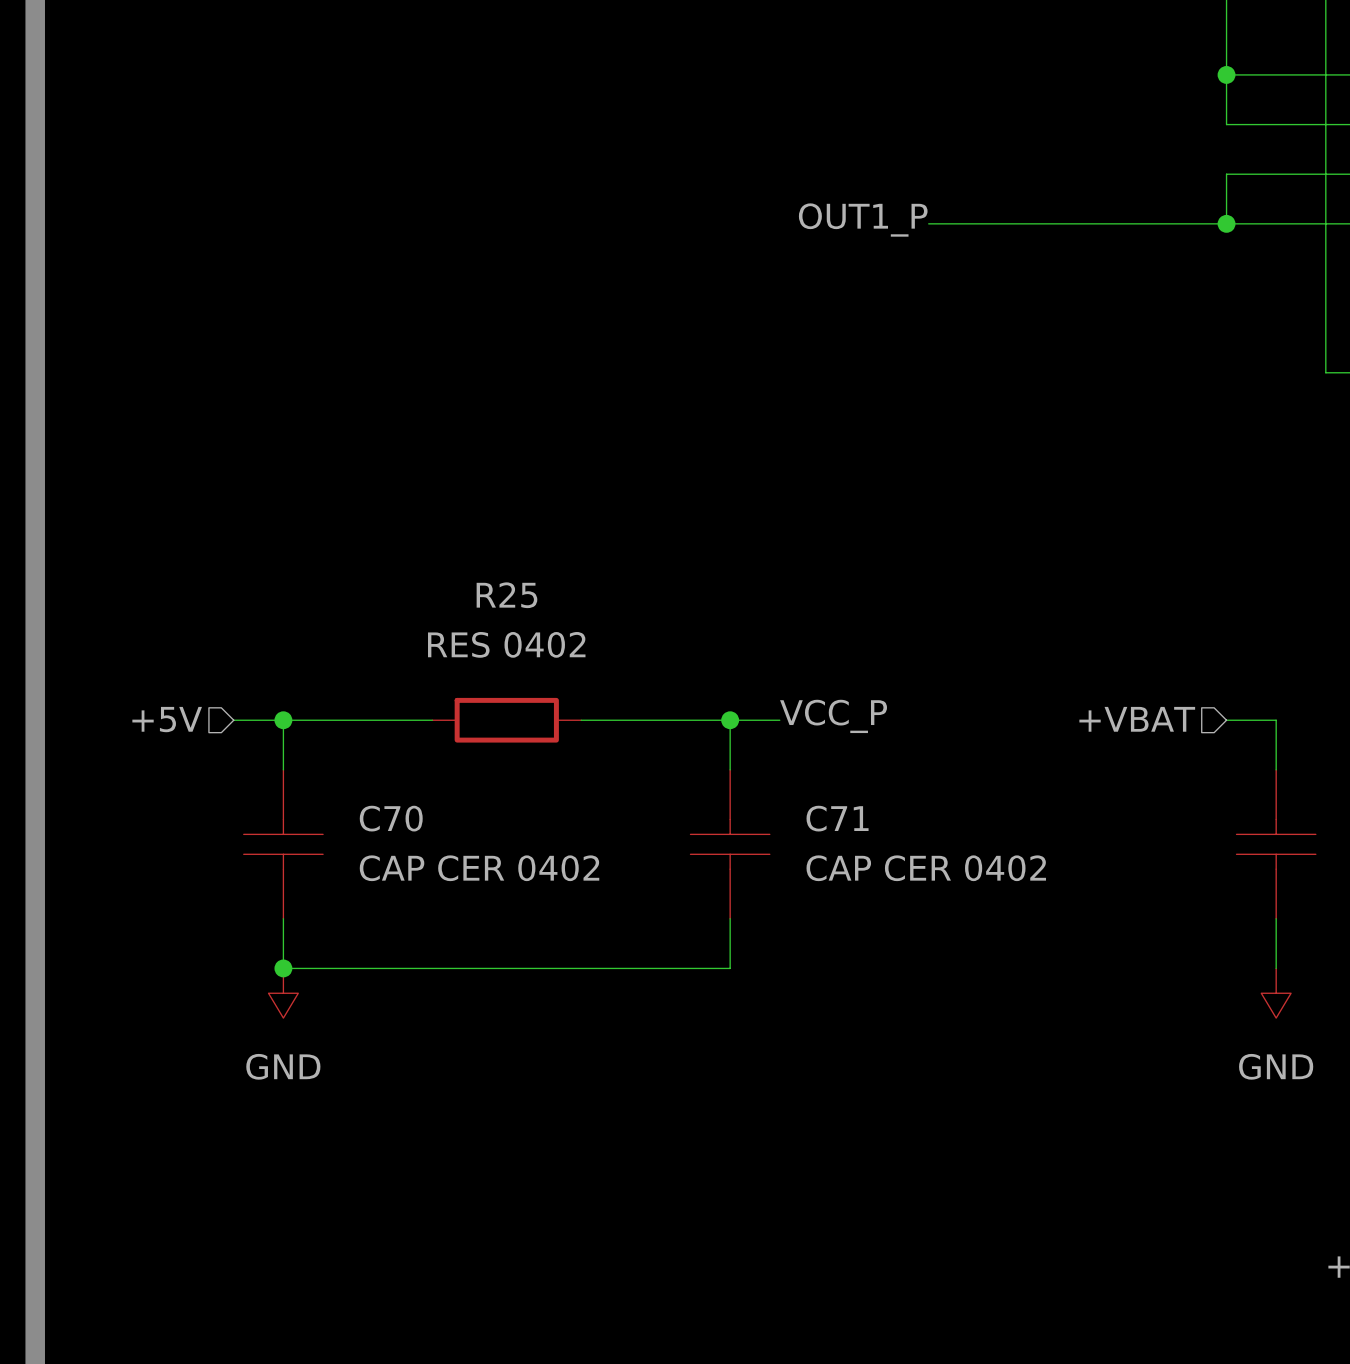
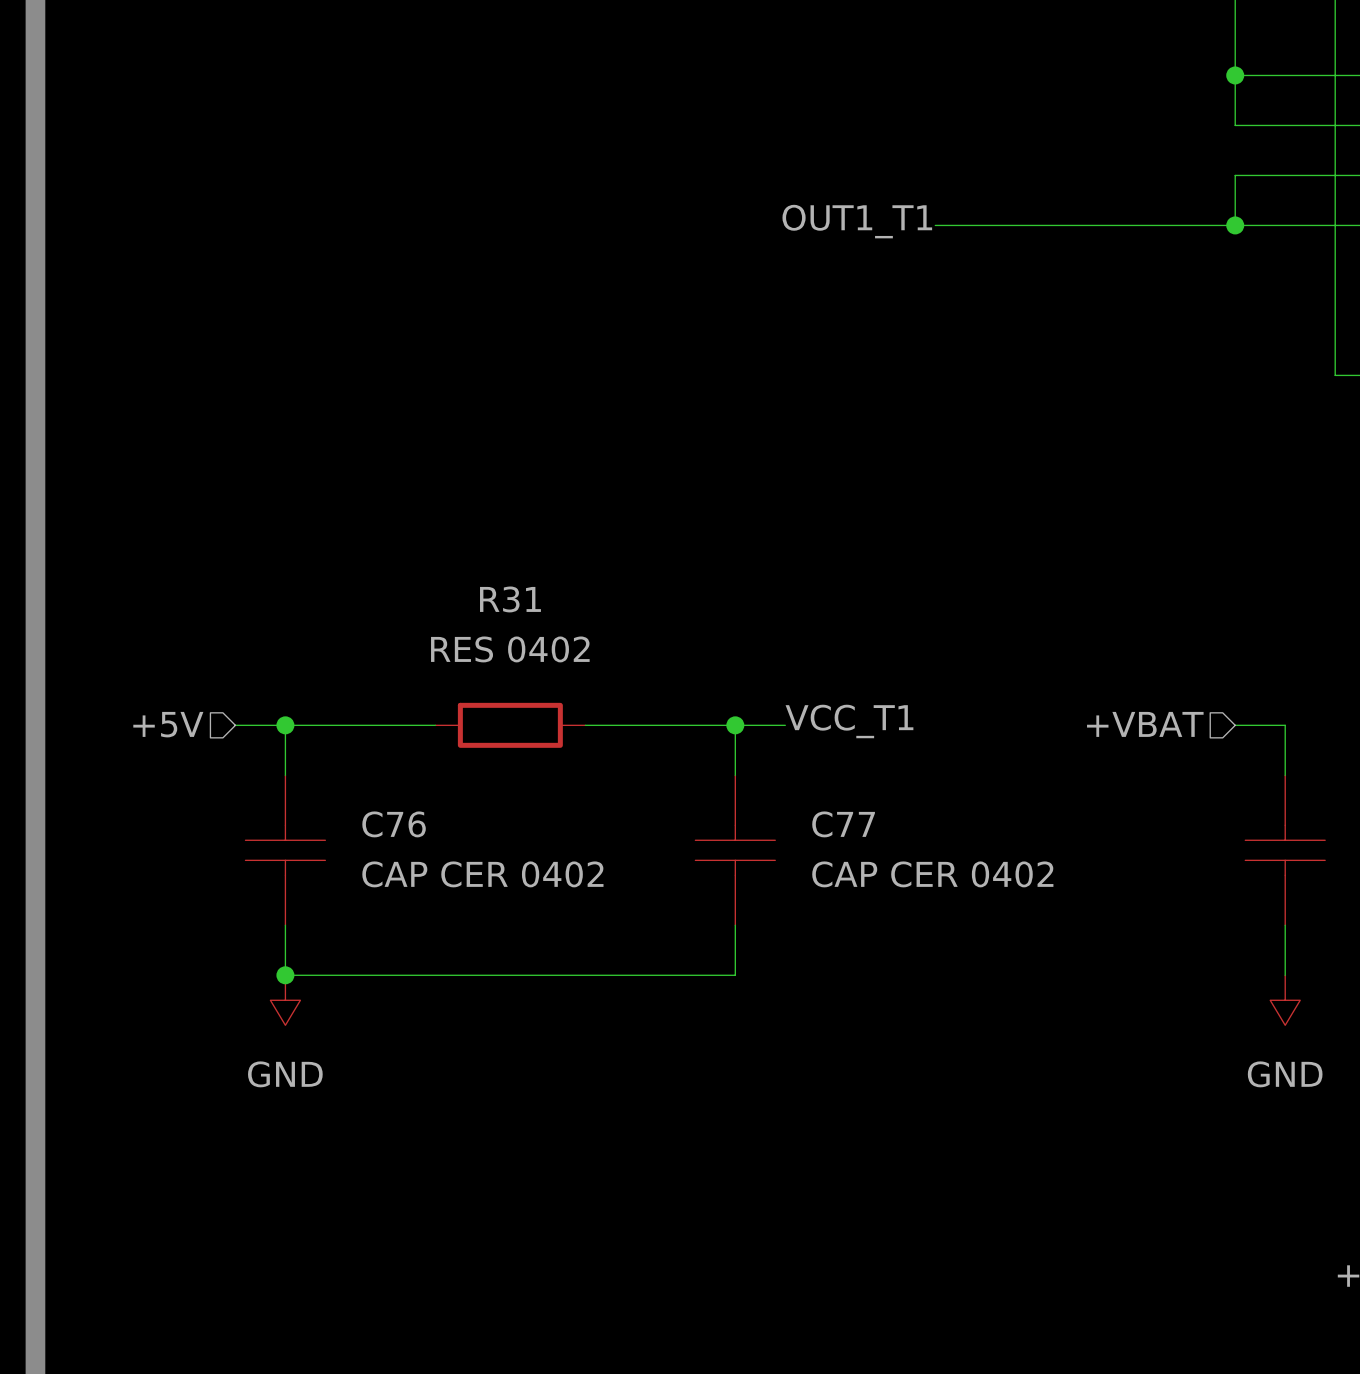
label: OUT1_P (863, 220) -> OUT1_T1 (857, 221)
R25 name: R25 (506, 595) -> R31 (510, 599)
label: VCC_P (833, 716) -> VCC_T1 (849, 721)
C70 name: C70 (391, 818) -> C76 (394, 824)
C71 name: C71 (837, 818) -> C77 (843, 824)

